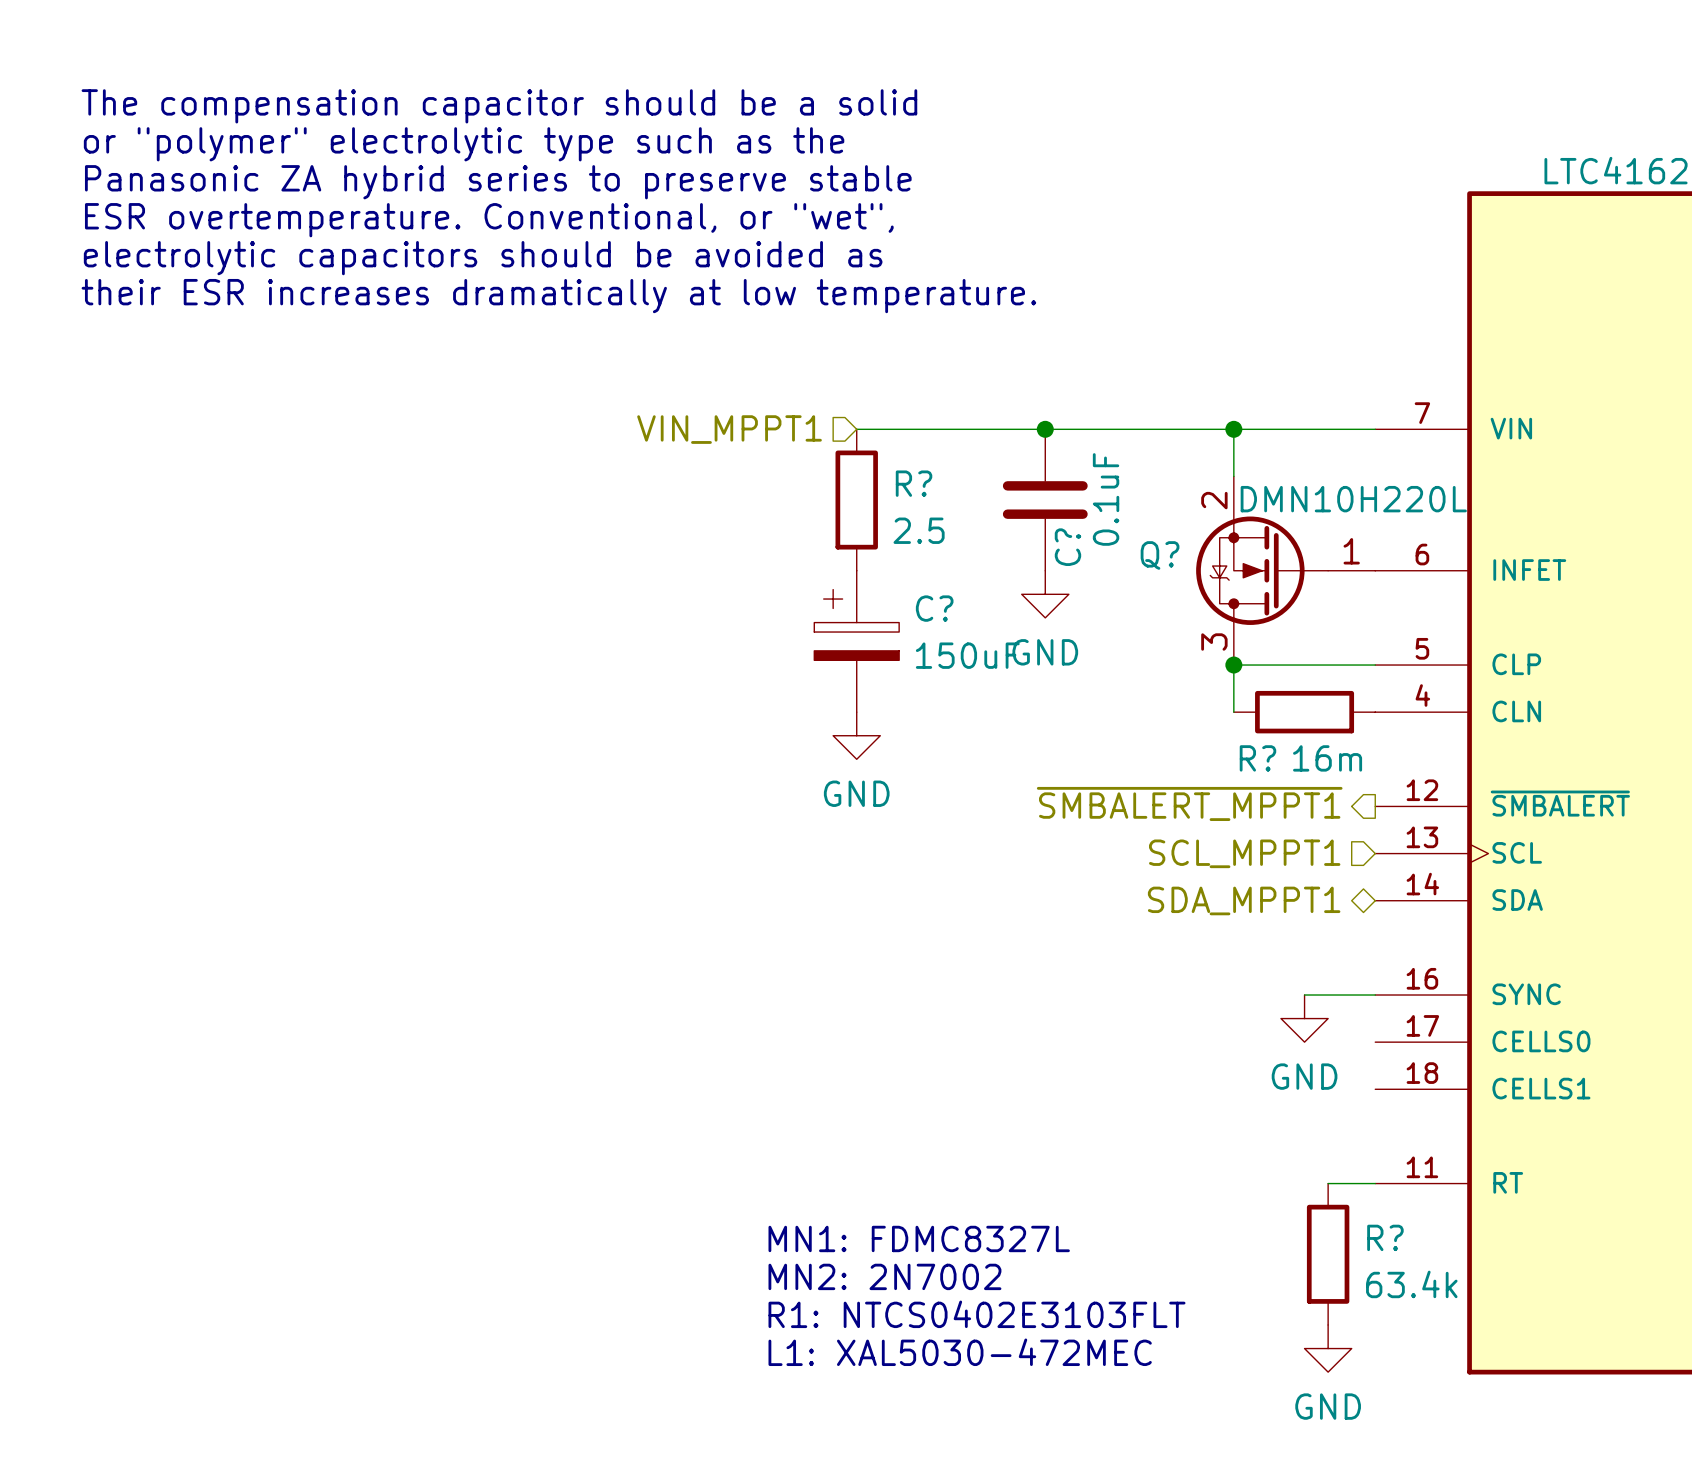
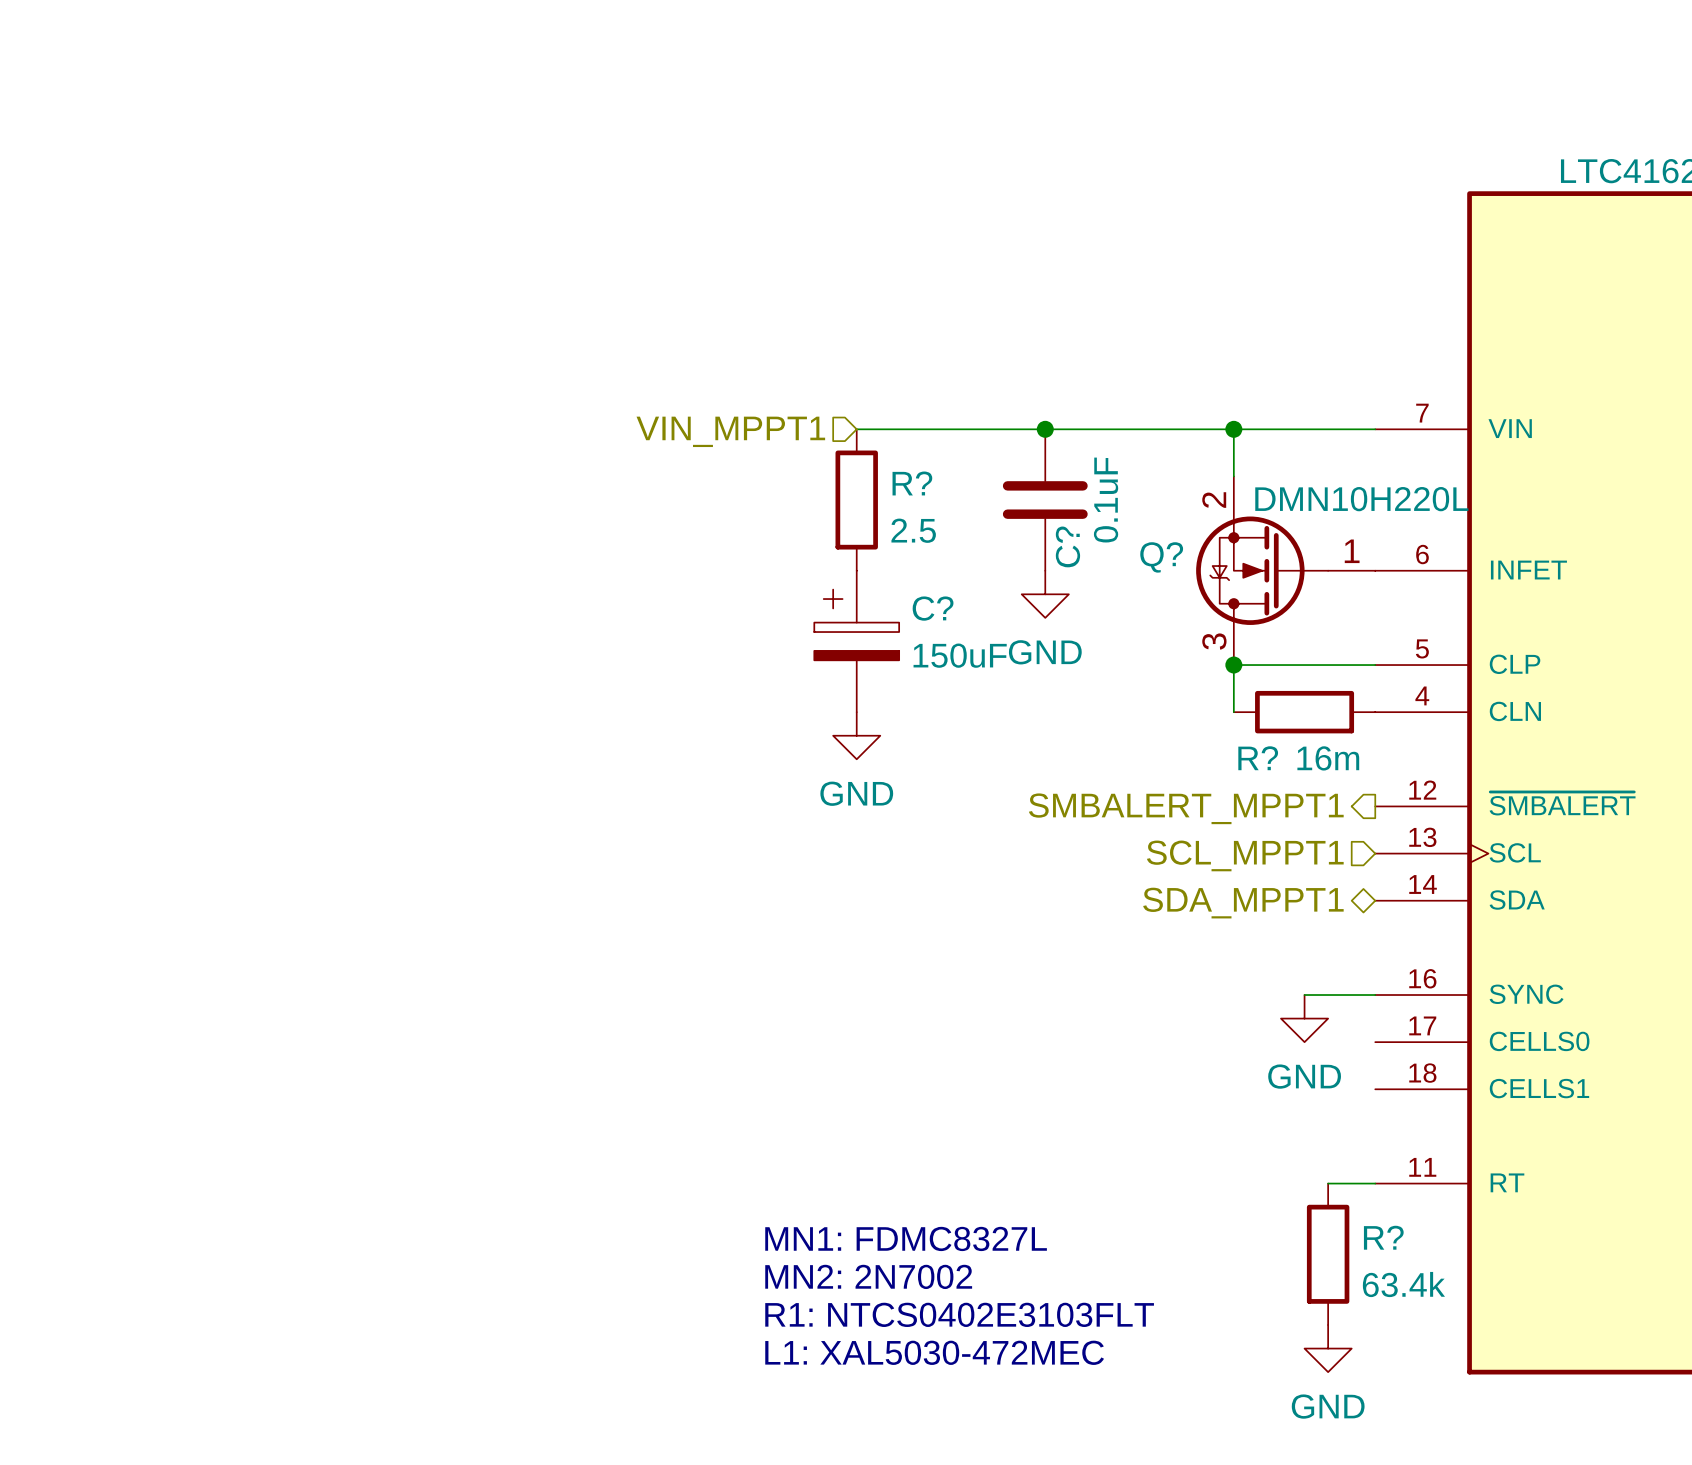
text: The compensation capacitor should be a solid (499, 106) -> none
text: or "polymer" electrolytic type such as the (464, 144) -> none
text: Panasonic ZA hybrid series to preserve stable (498, 182) -> none
text: ESR overtemperature. Conventional, or "wet", (489, 220) -> none
text: electrolytic capacitors should be avoided as (483, 258) -> none
text: their ESR increases dramatically at low temperature. (558, 296) -> none
hierarchical label: ~{SMBALERT_MPPT1} (1189, 803) -> SMBALERT_MPPT1 (1186, 808)

